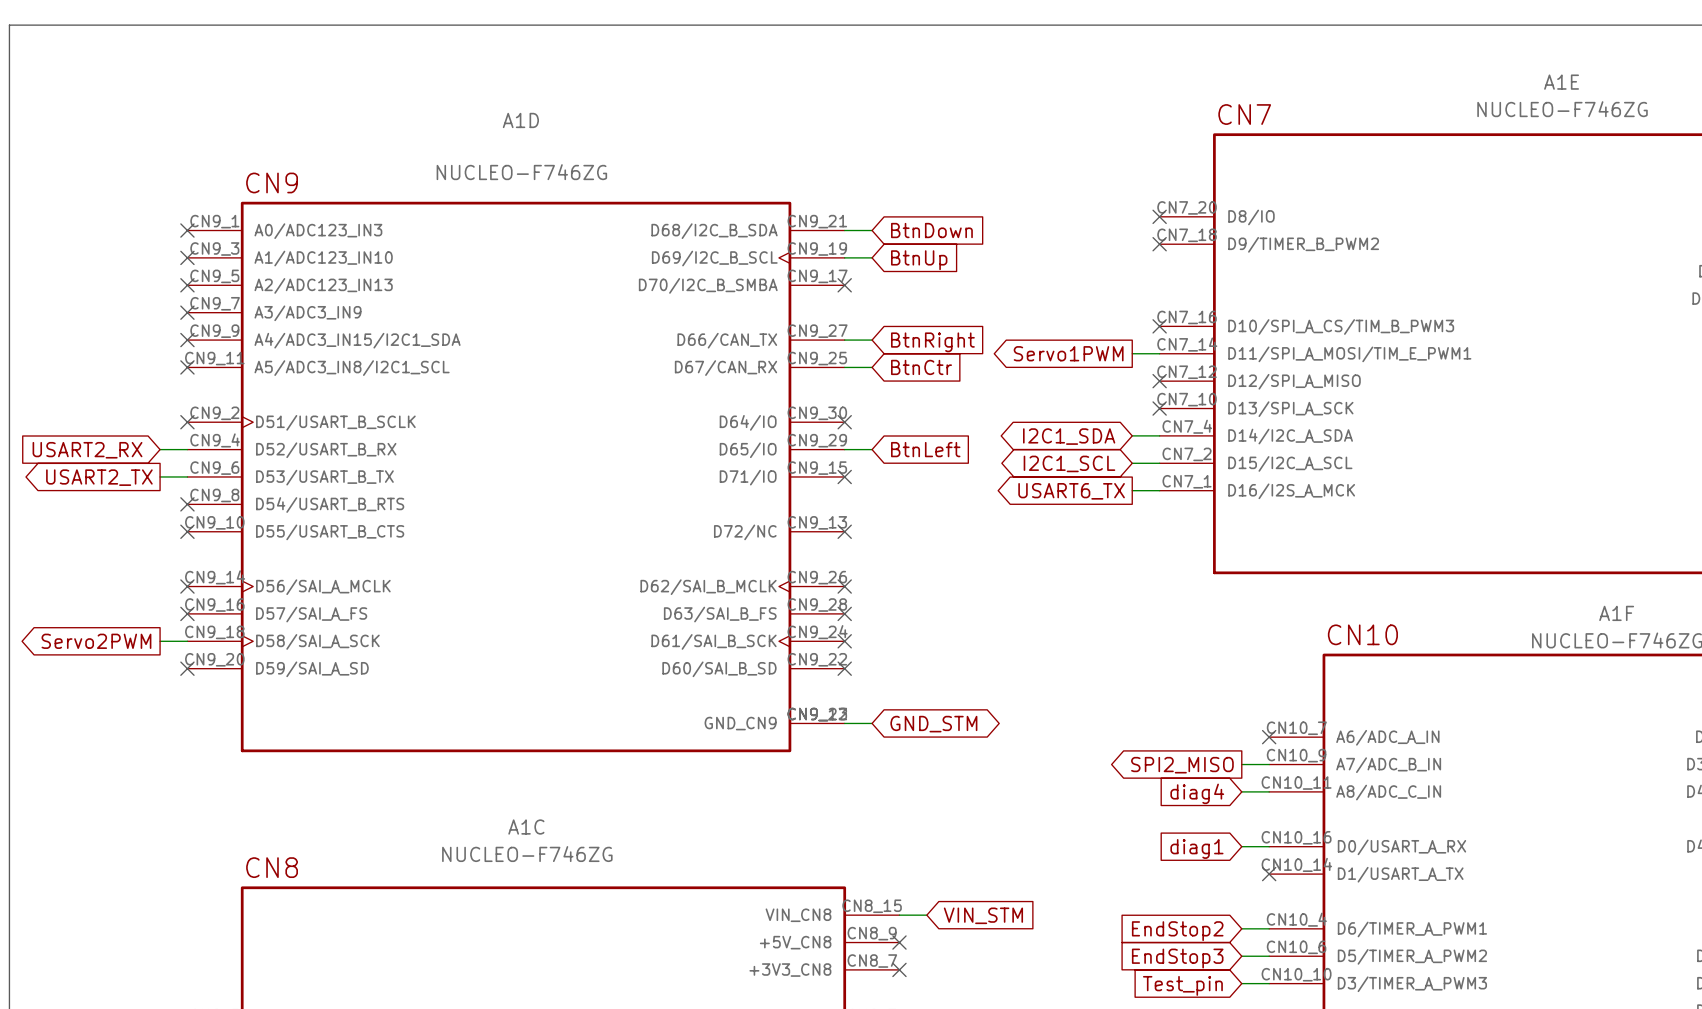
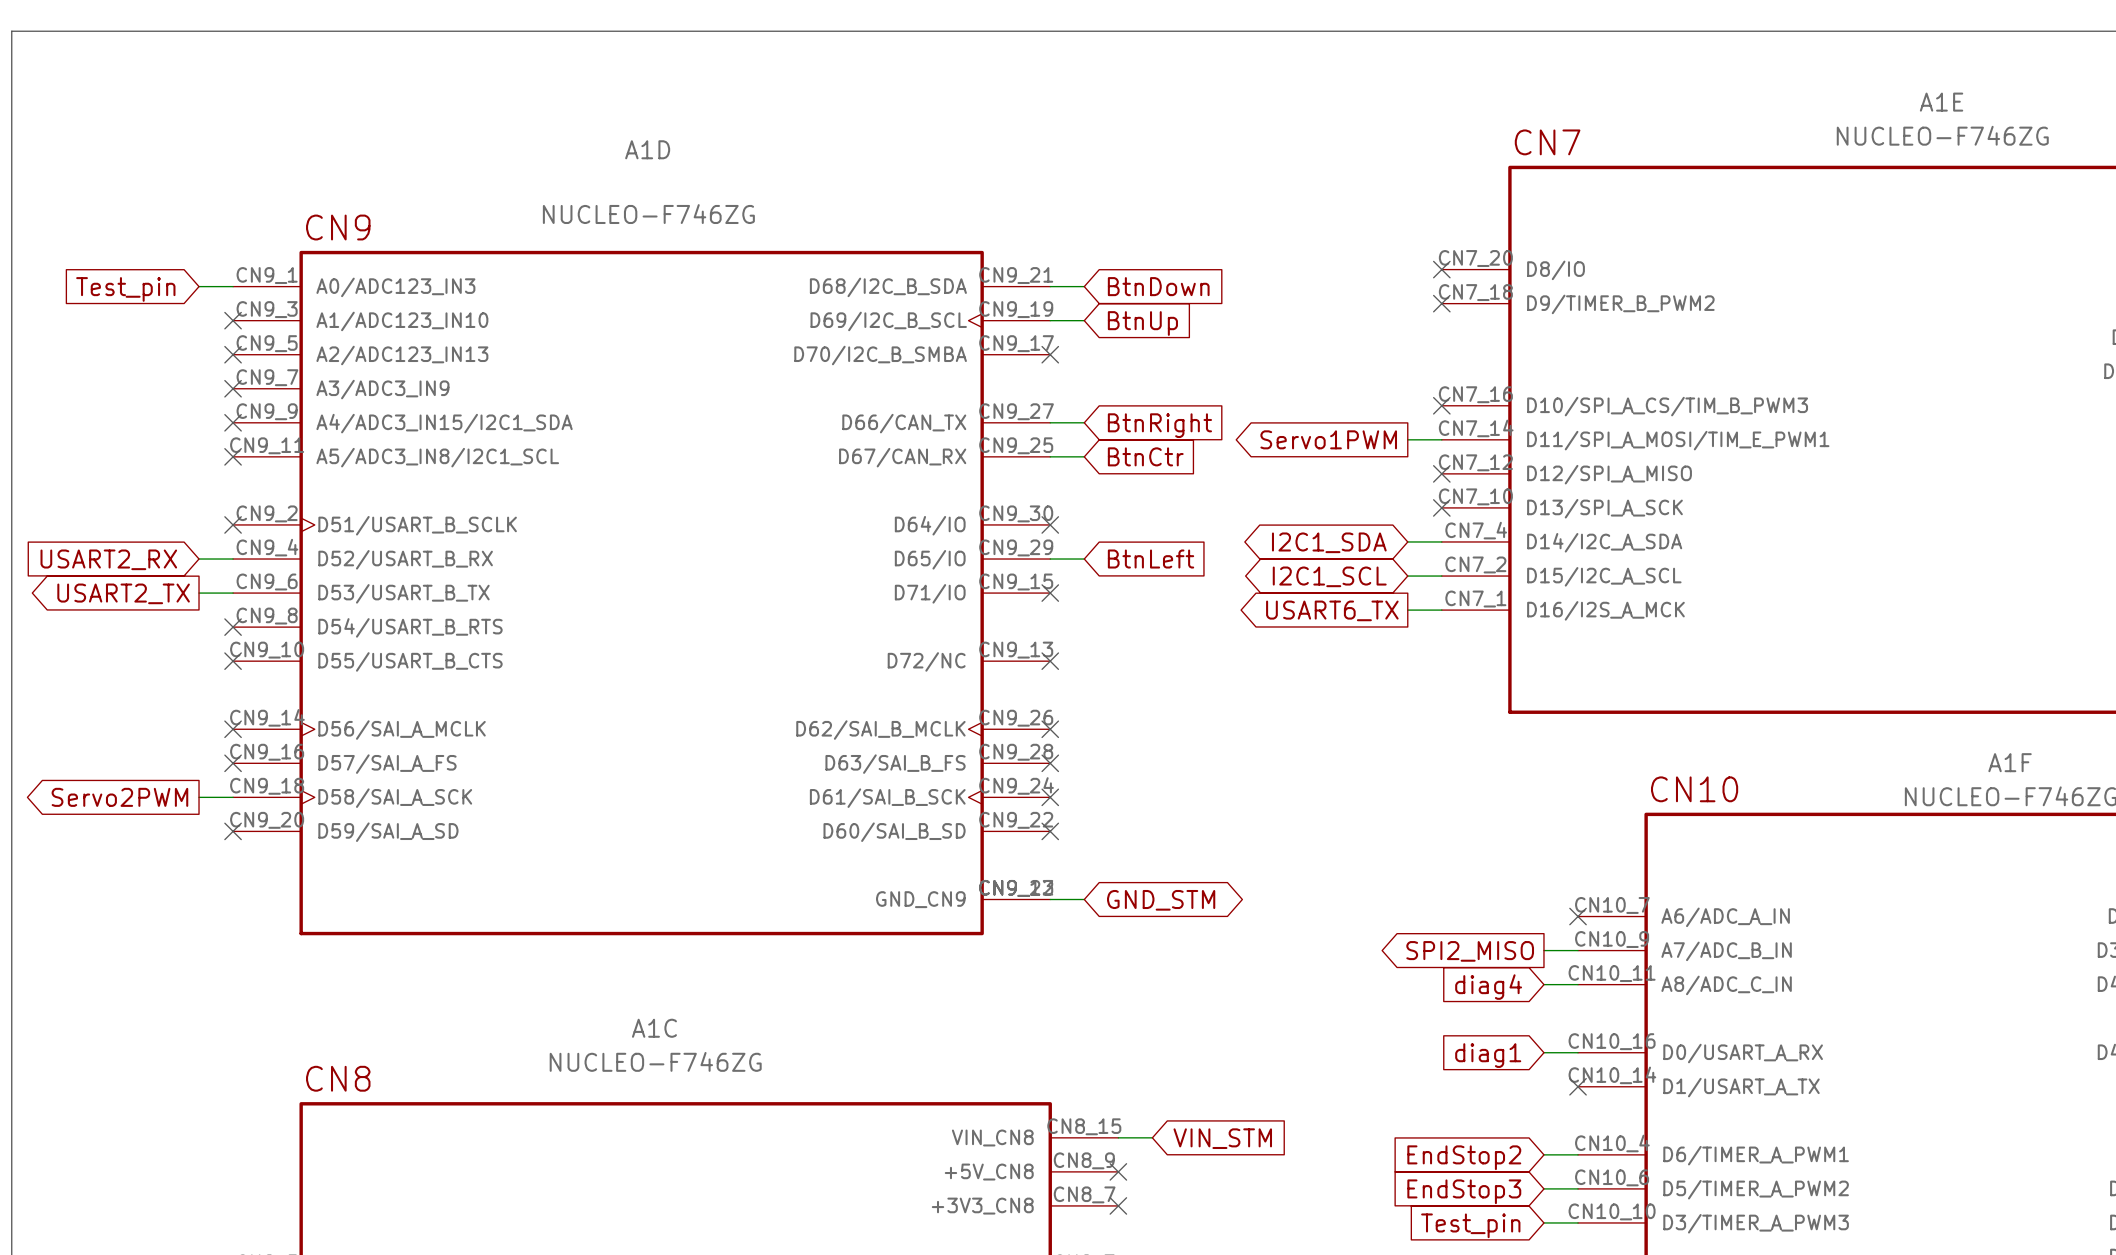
wire: none -> (199, 286) (233, 286)
no-connect mark: (187, 230) -> none
global label: none -> Test_pin (125, 289)

